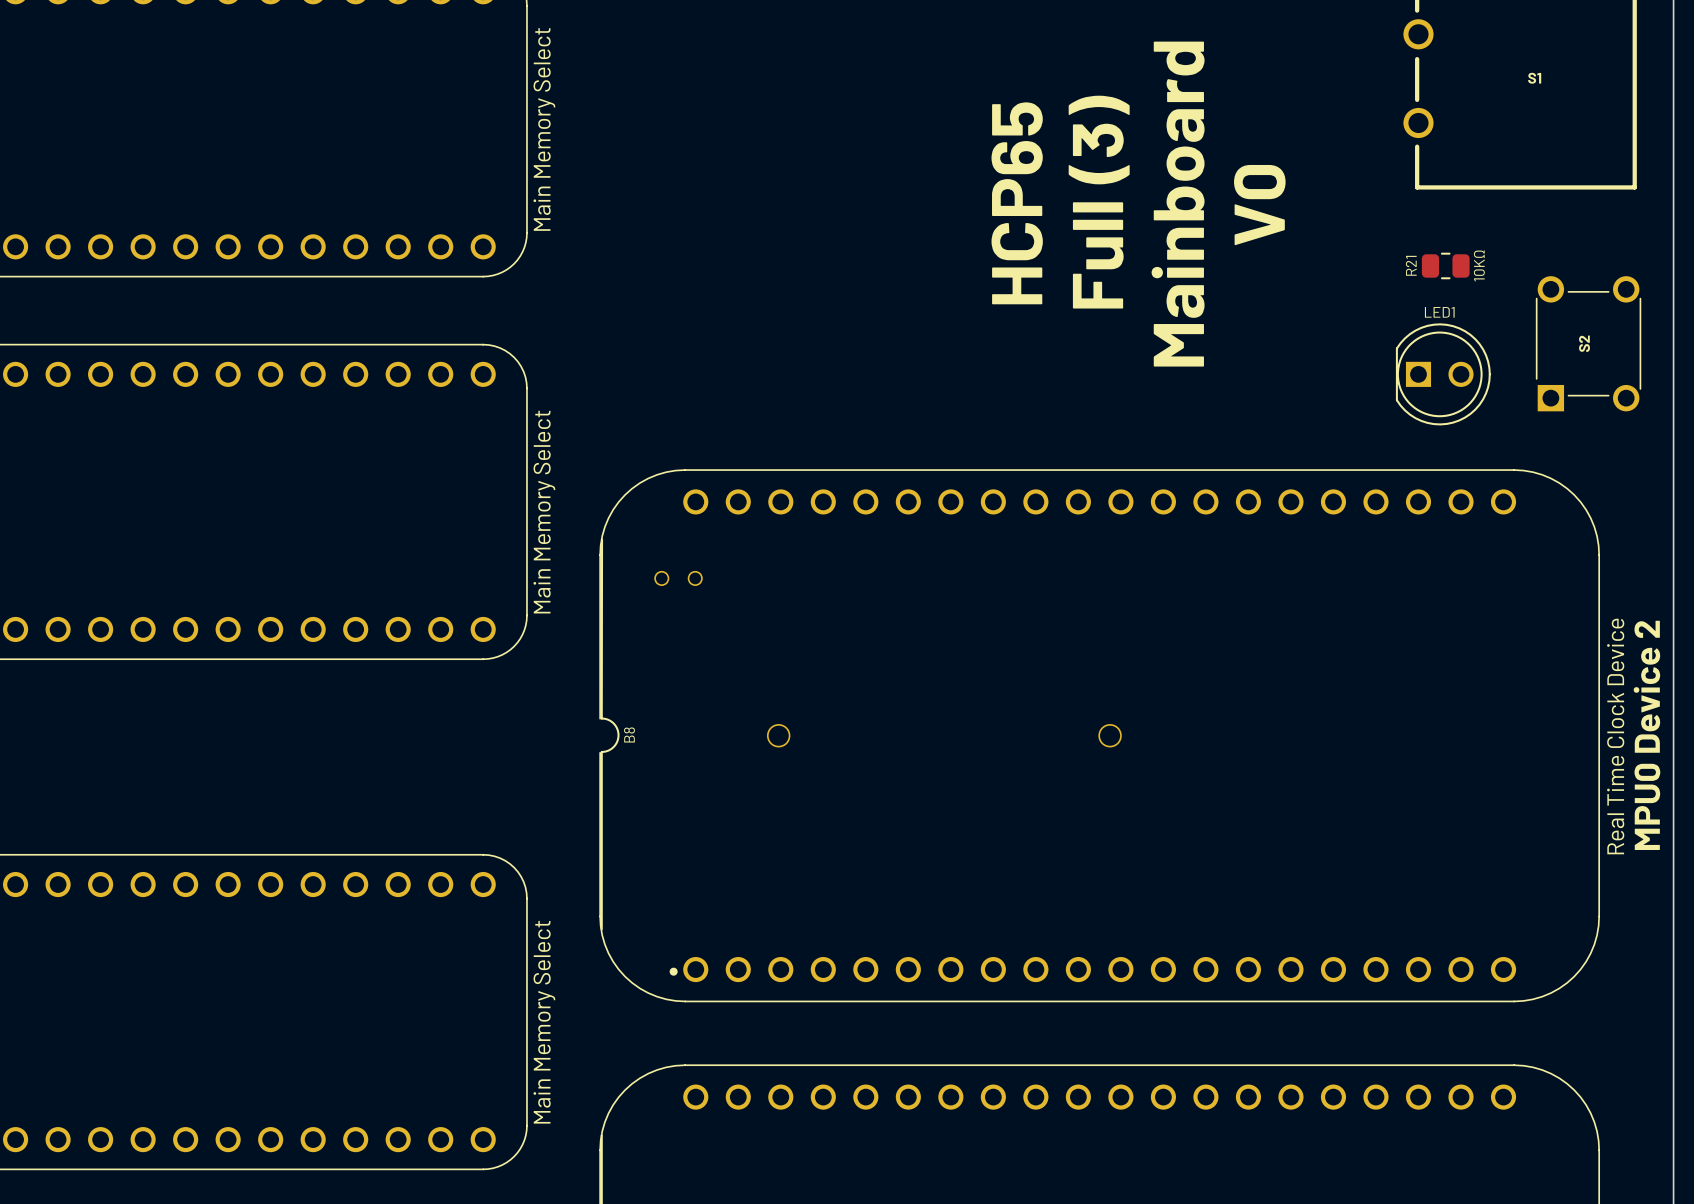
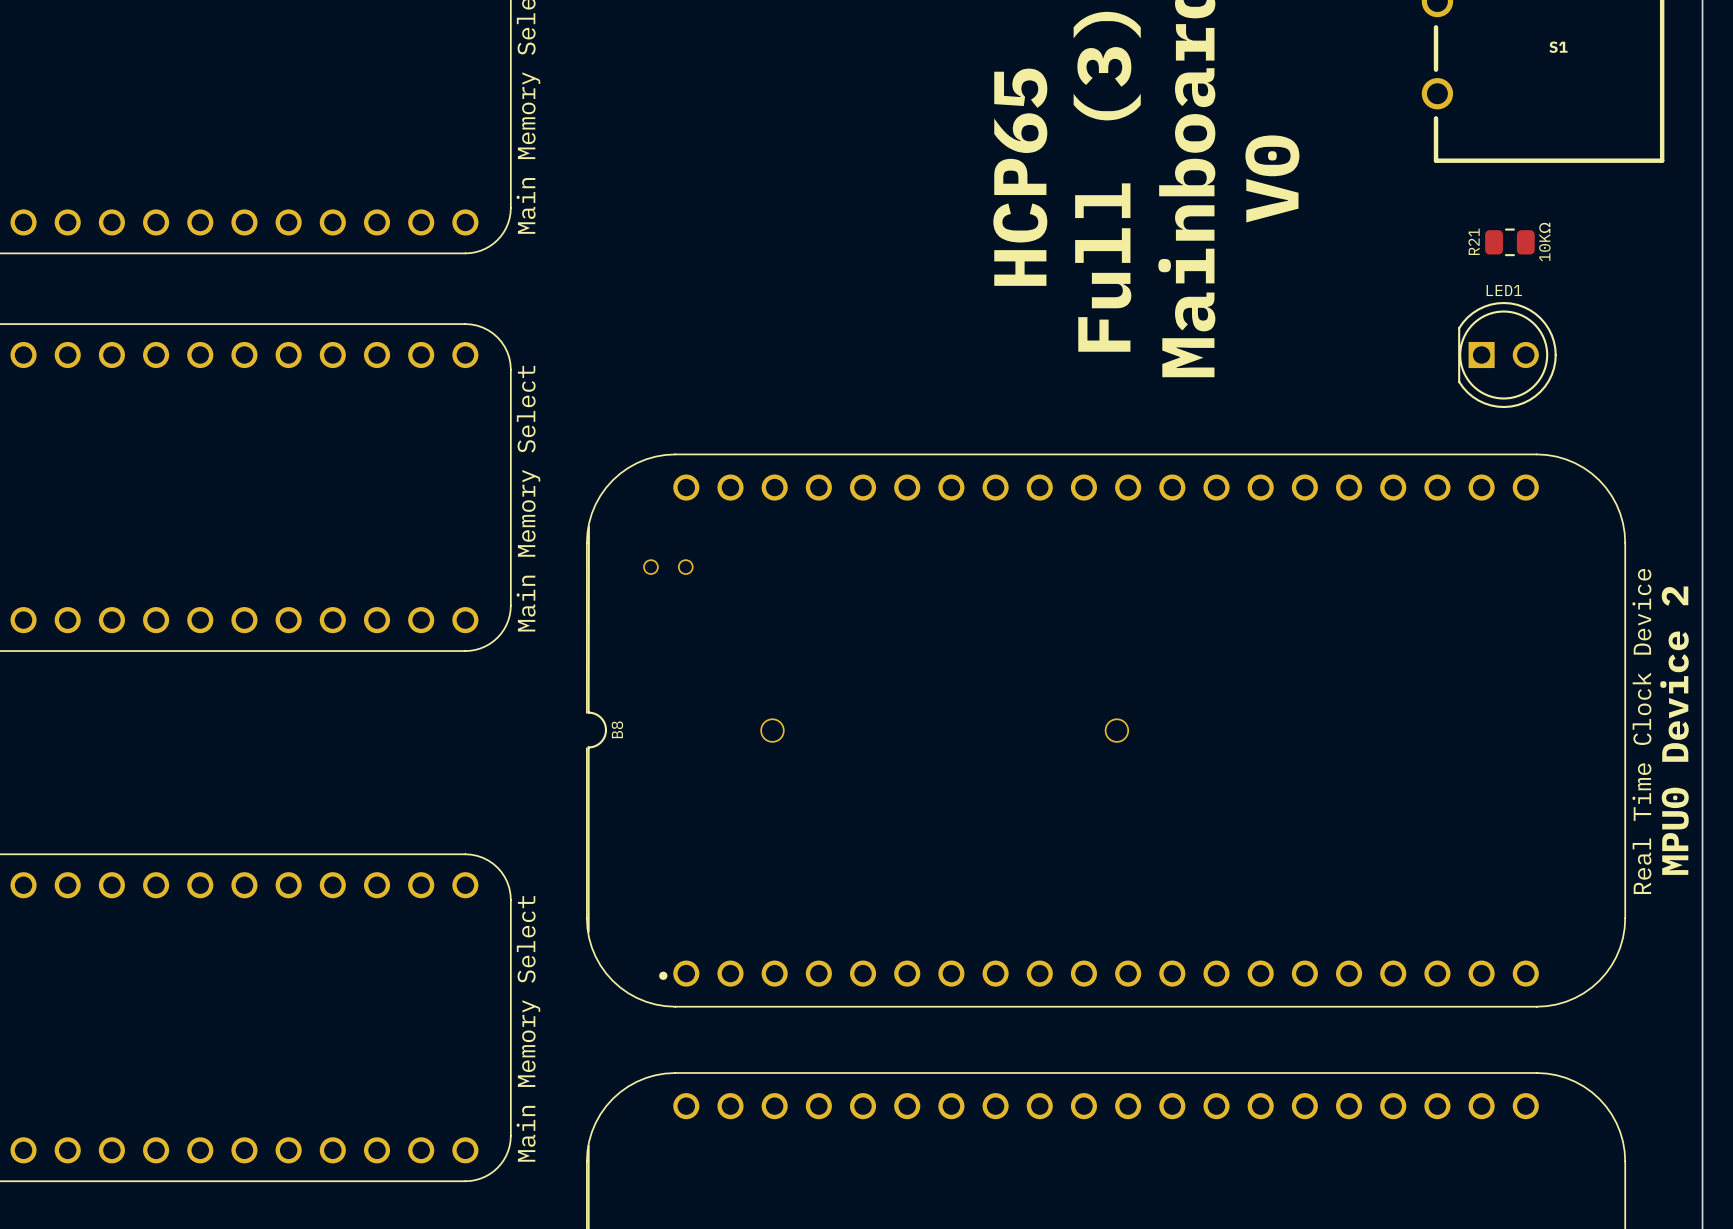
R21 position: (1445, 265) -> (1509, 242)
S2: (1588, 343) -> none
LED1 position: (1443, 374) -> (1507, 355)

